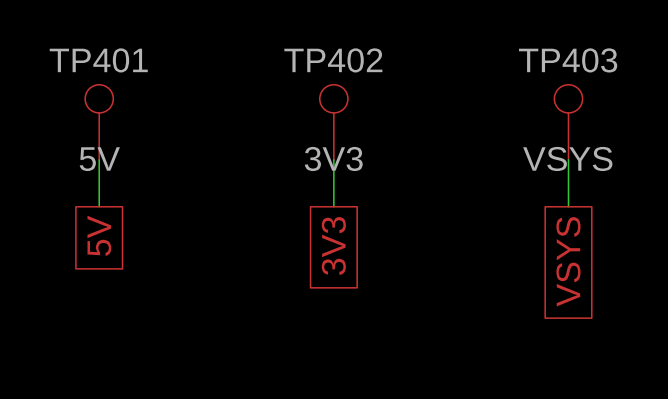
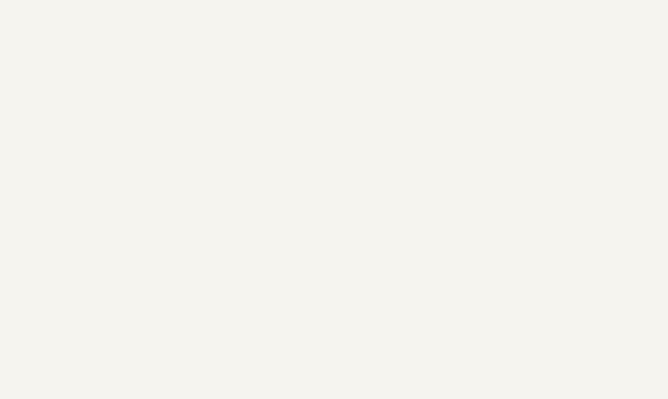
TP401: 5V (99, 122) -> none
TP402: 3V3 (333, 122) -> none
TP403: VSYS (568, 122) -> none
wire: (99, 159) (99, 206) -> none
wire: (333, 159) (333, 206) -> none
wire: (568, 159) (568, 206) -> none
global label: 5V (99, 235) -> none
global label: 3V3 (333, 246) -> none
global label: VSYS (568, 261) -> none

